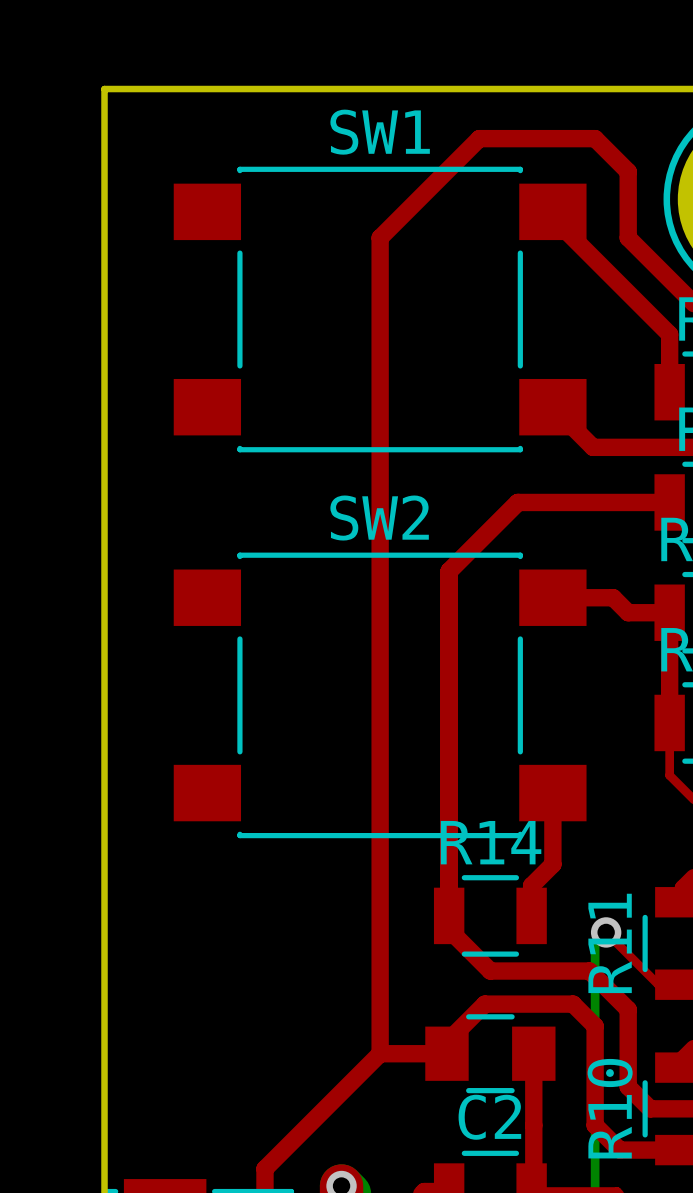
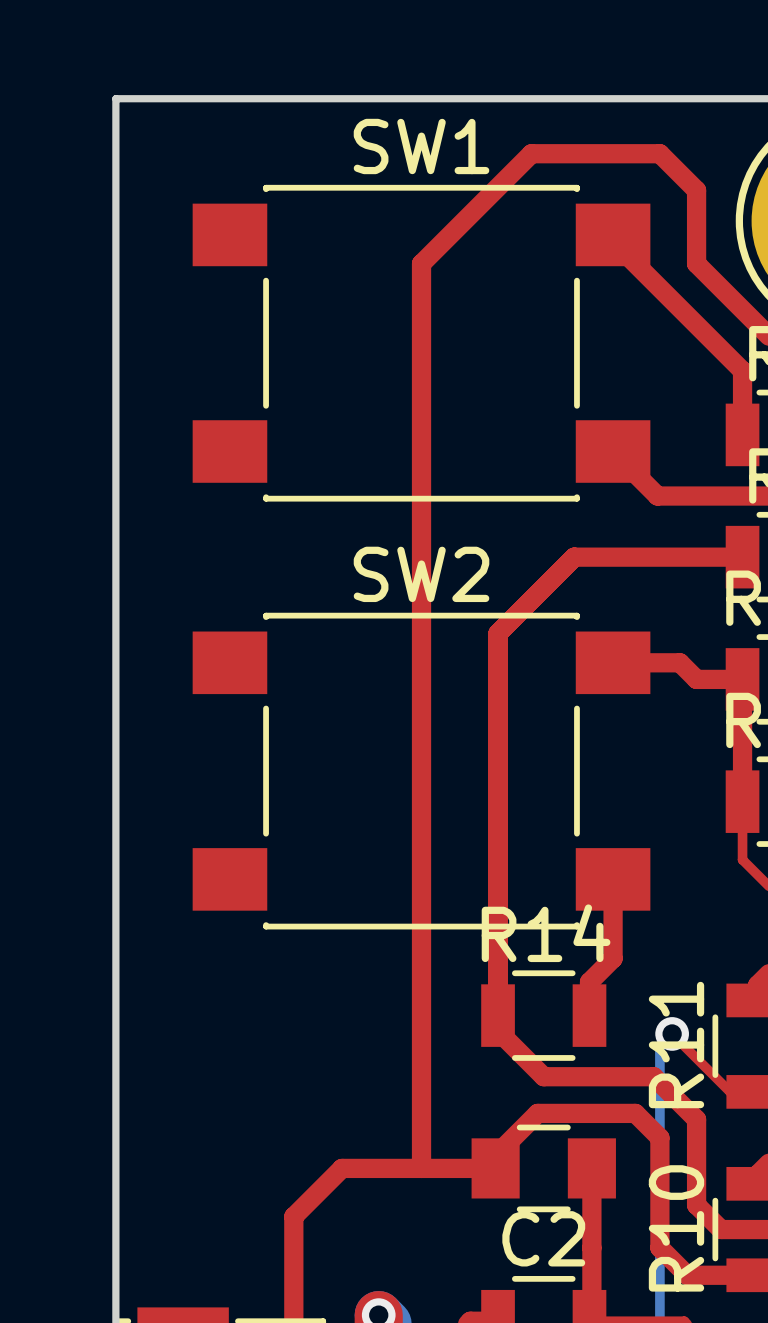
top track: (380, 1053) (264, 1168) -> (421, 1168) (342, 1168) (293, 1216) (293, 1296)

